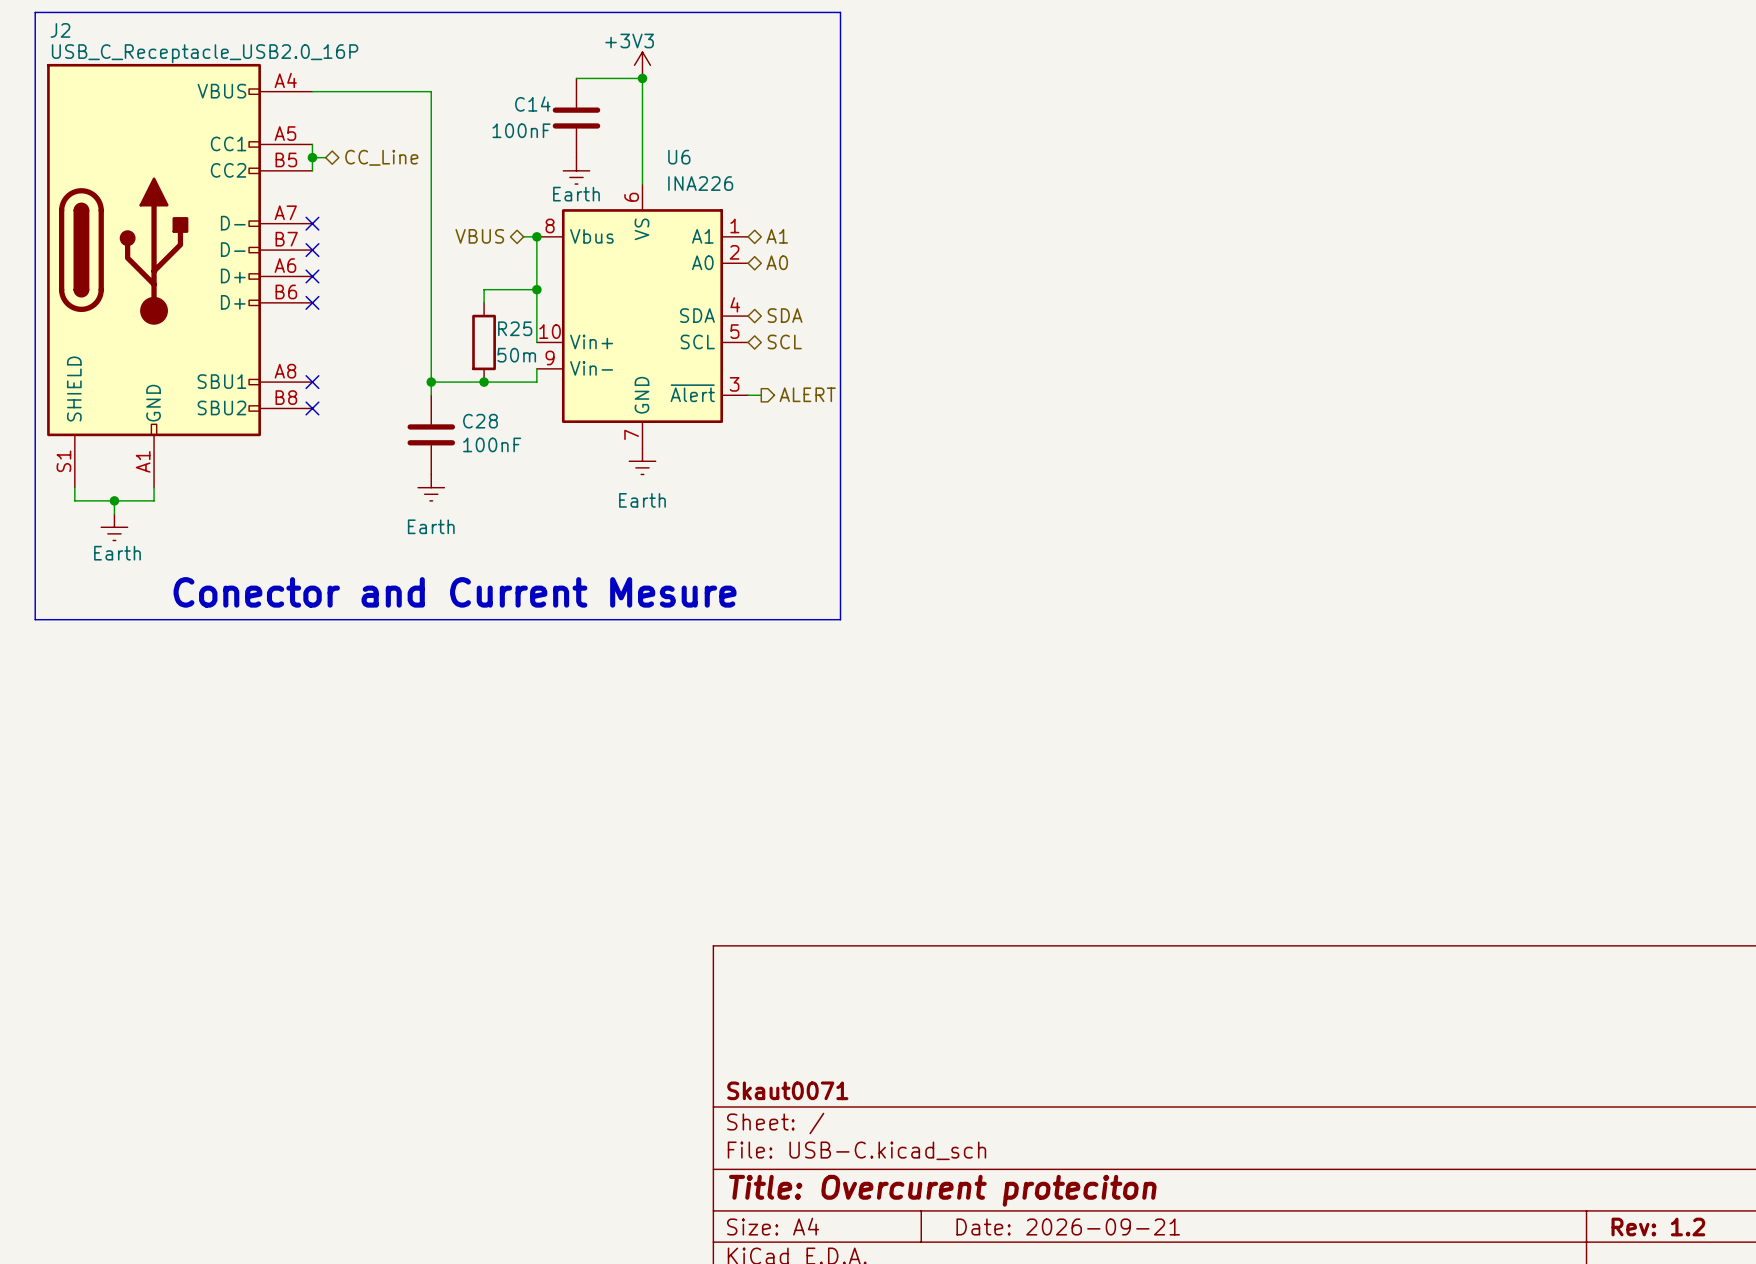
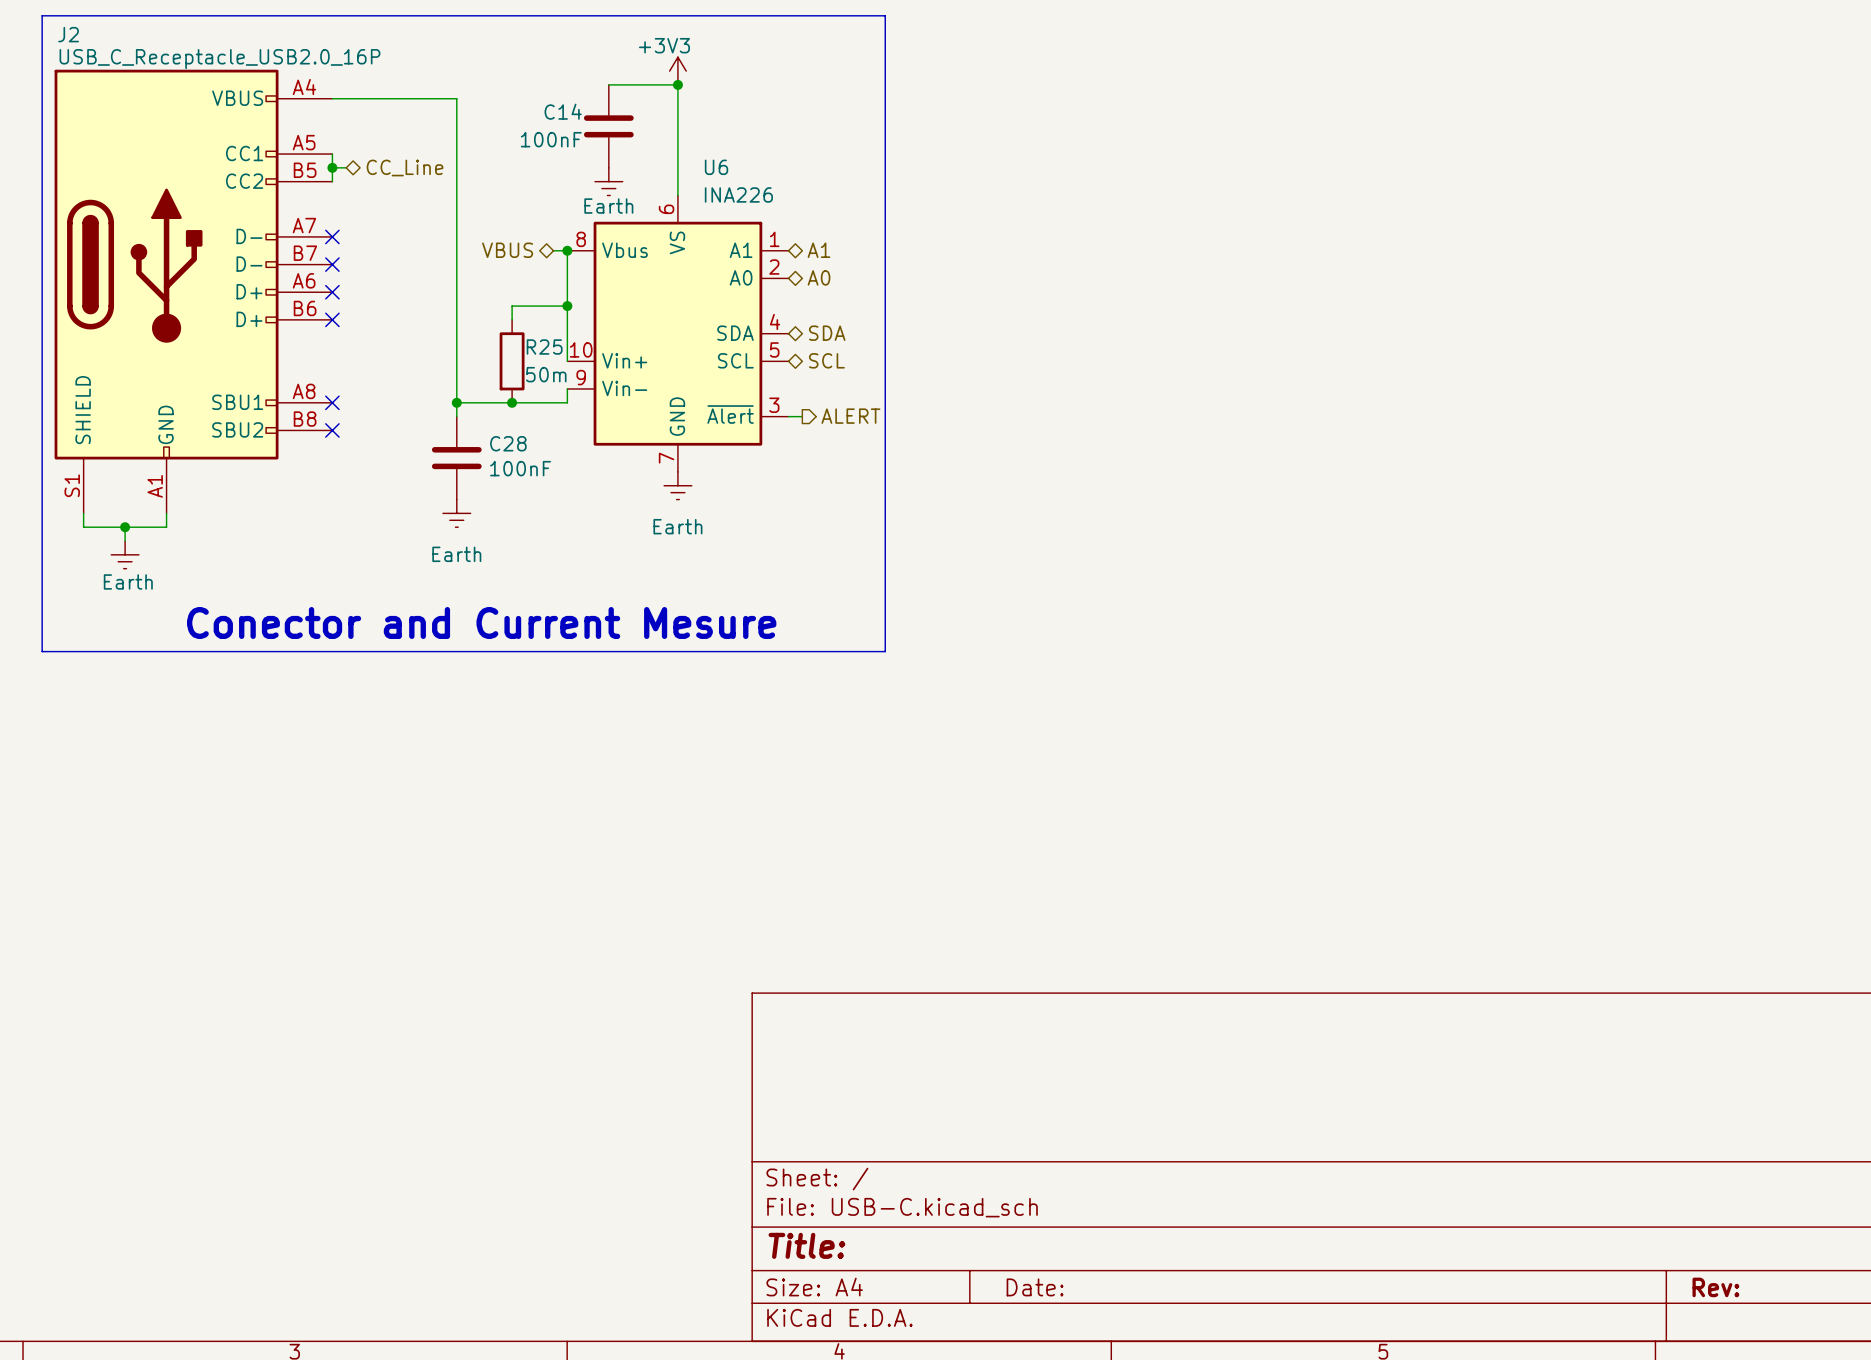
title block: Skaut0071 (787, 1090) -> none
title block: Title: Overcurent proteciton (942, 1190) -> Title: (806, 1245)
title block: Date: 2026-09-21 (1068, 1226) -> Date: (1035, 1287)
title block: Rev: 1.2 (1658, 1226) -> Rev: (1715, 1287)

